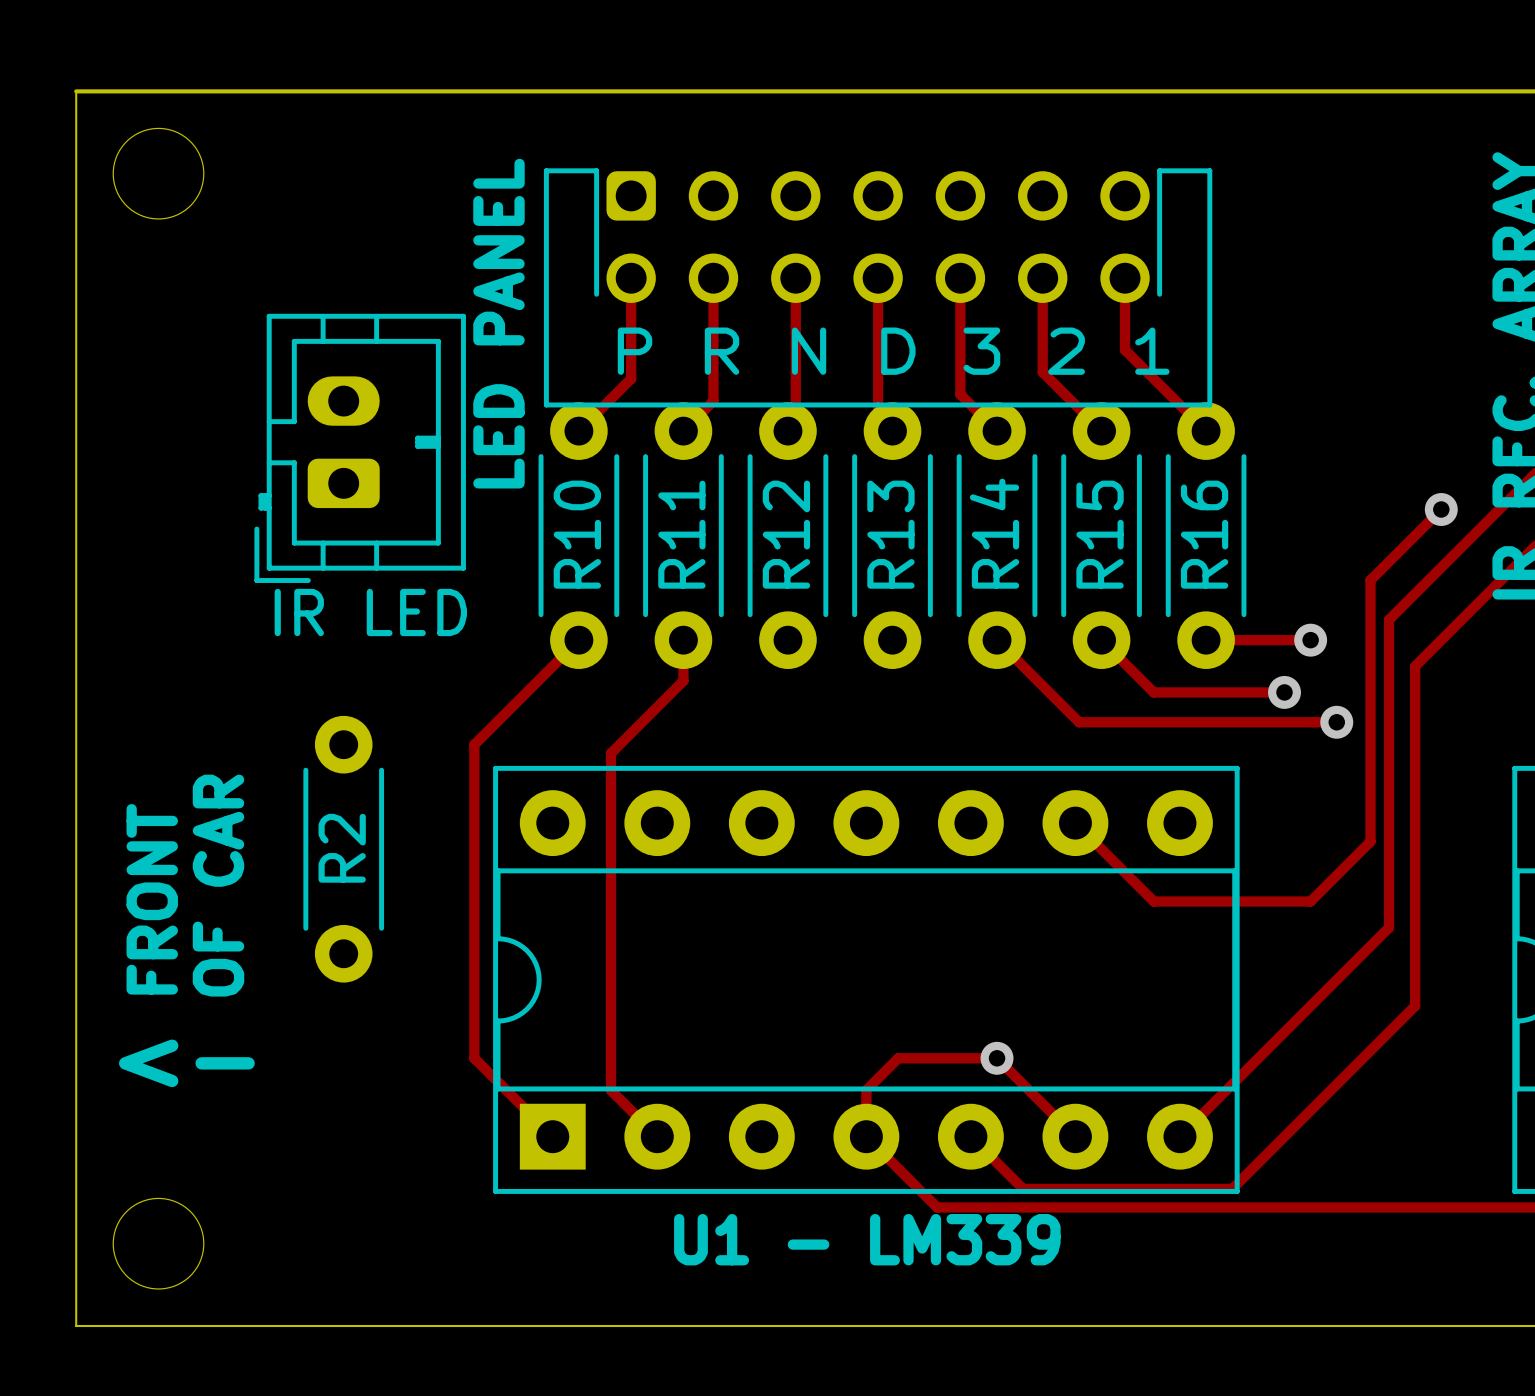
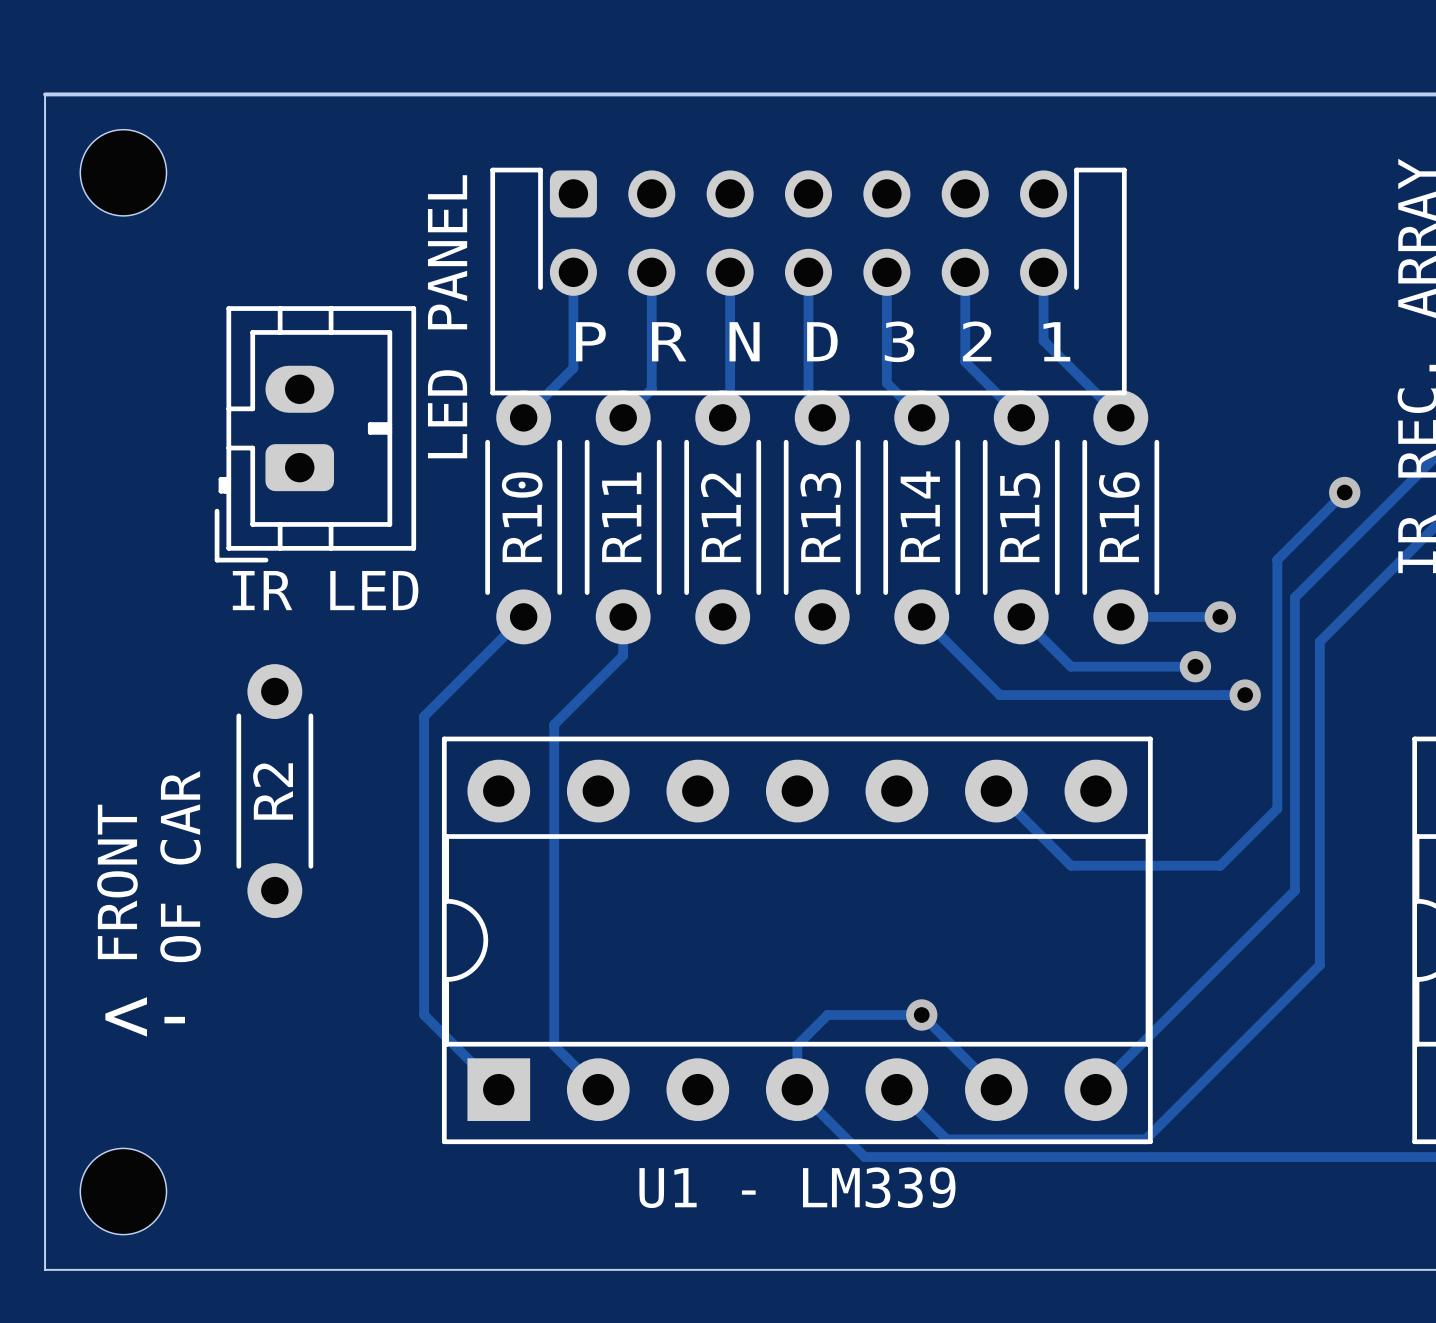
R2 position: (343, 849) -> (274, 791)

